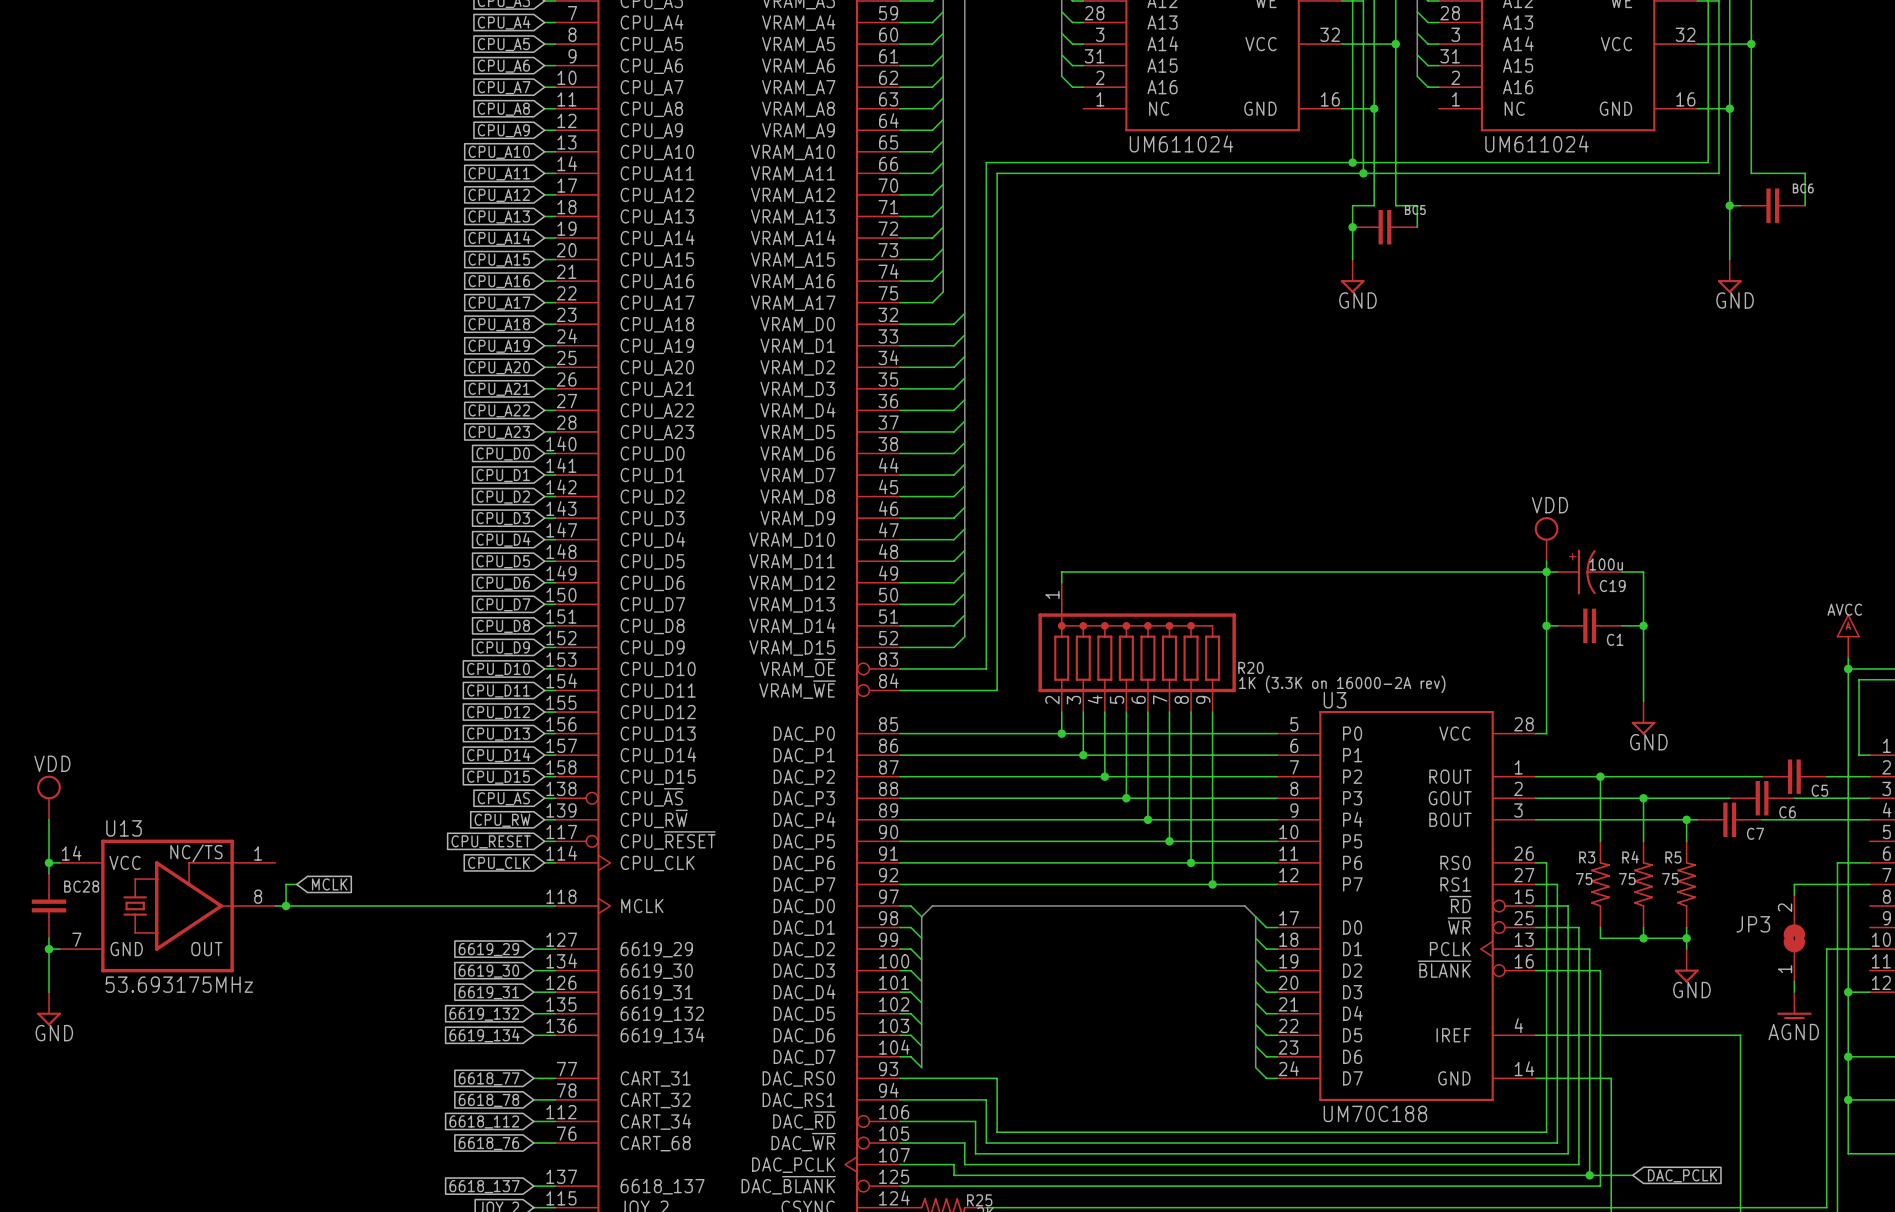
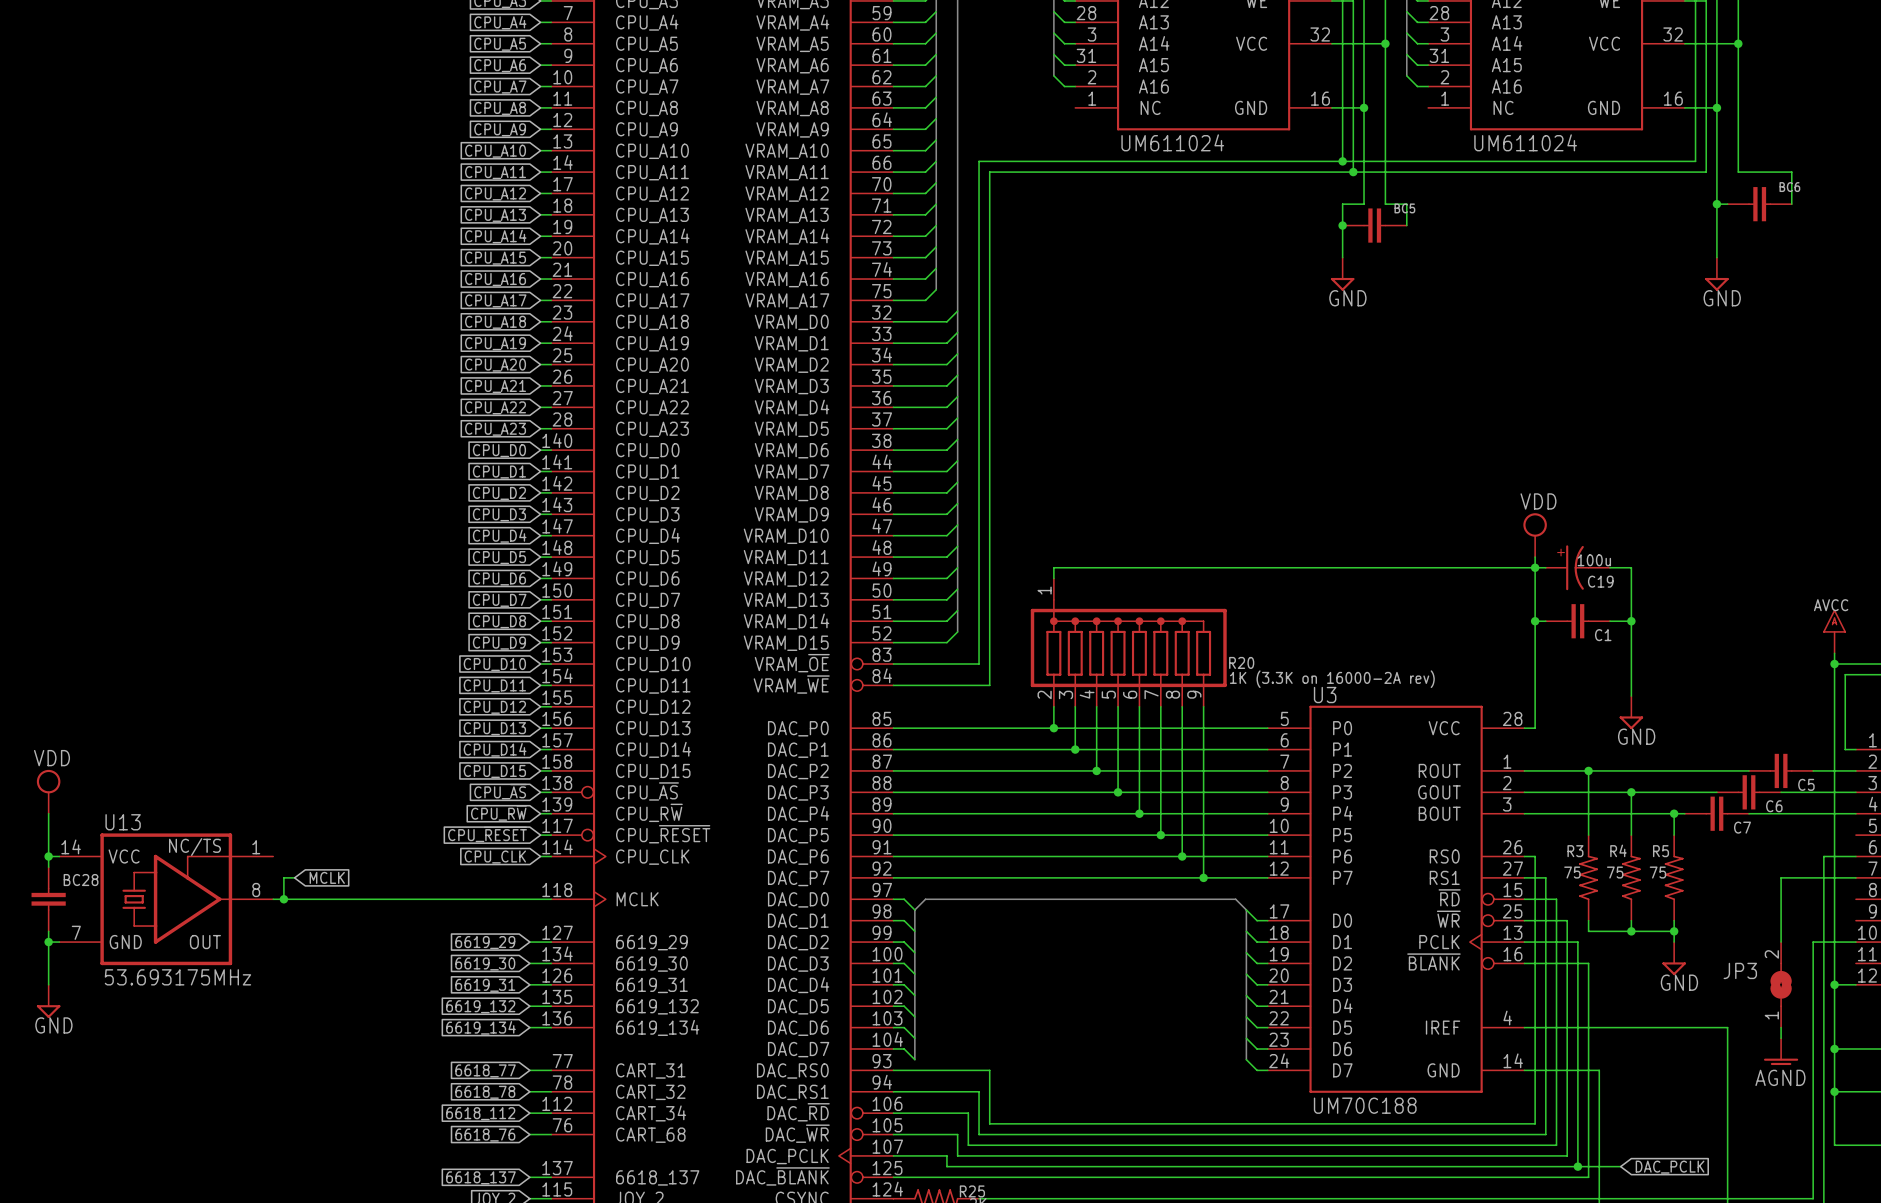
JP3 position: (1794, 938) -> (1781, 984)
power symbol position: AGND (1794, 1005) -> AGND (1781, 1051)

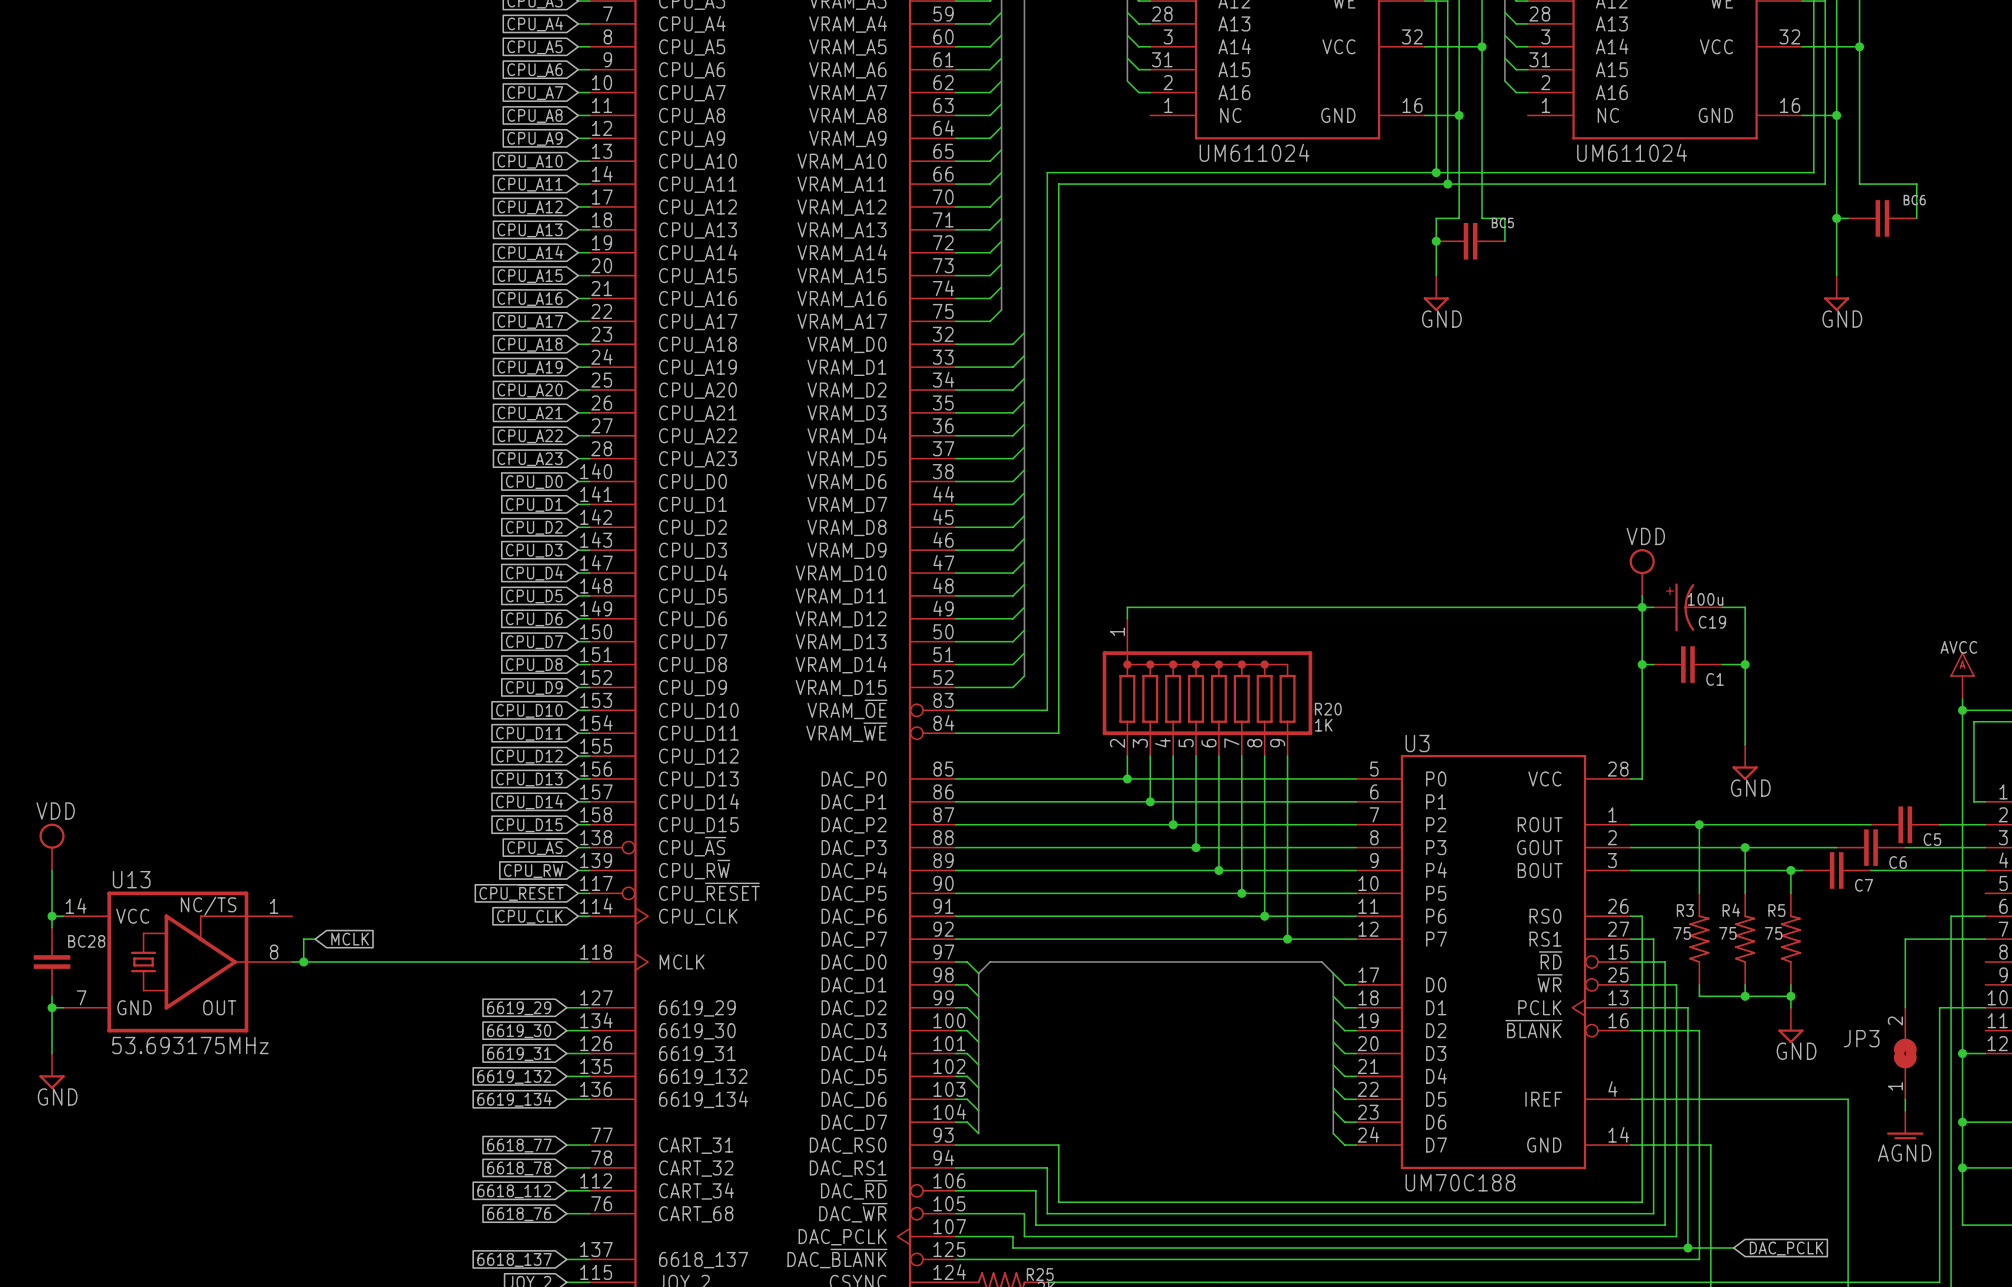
R20 value: 1K (3.3K on 16000-2A rev) (1332, 679) -> 1K (1323, 725)

